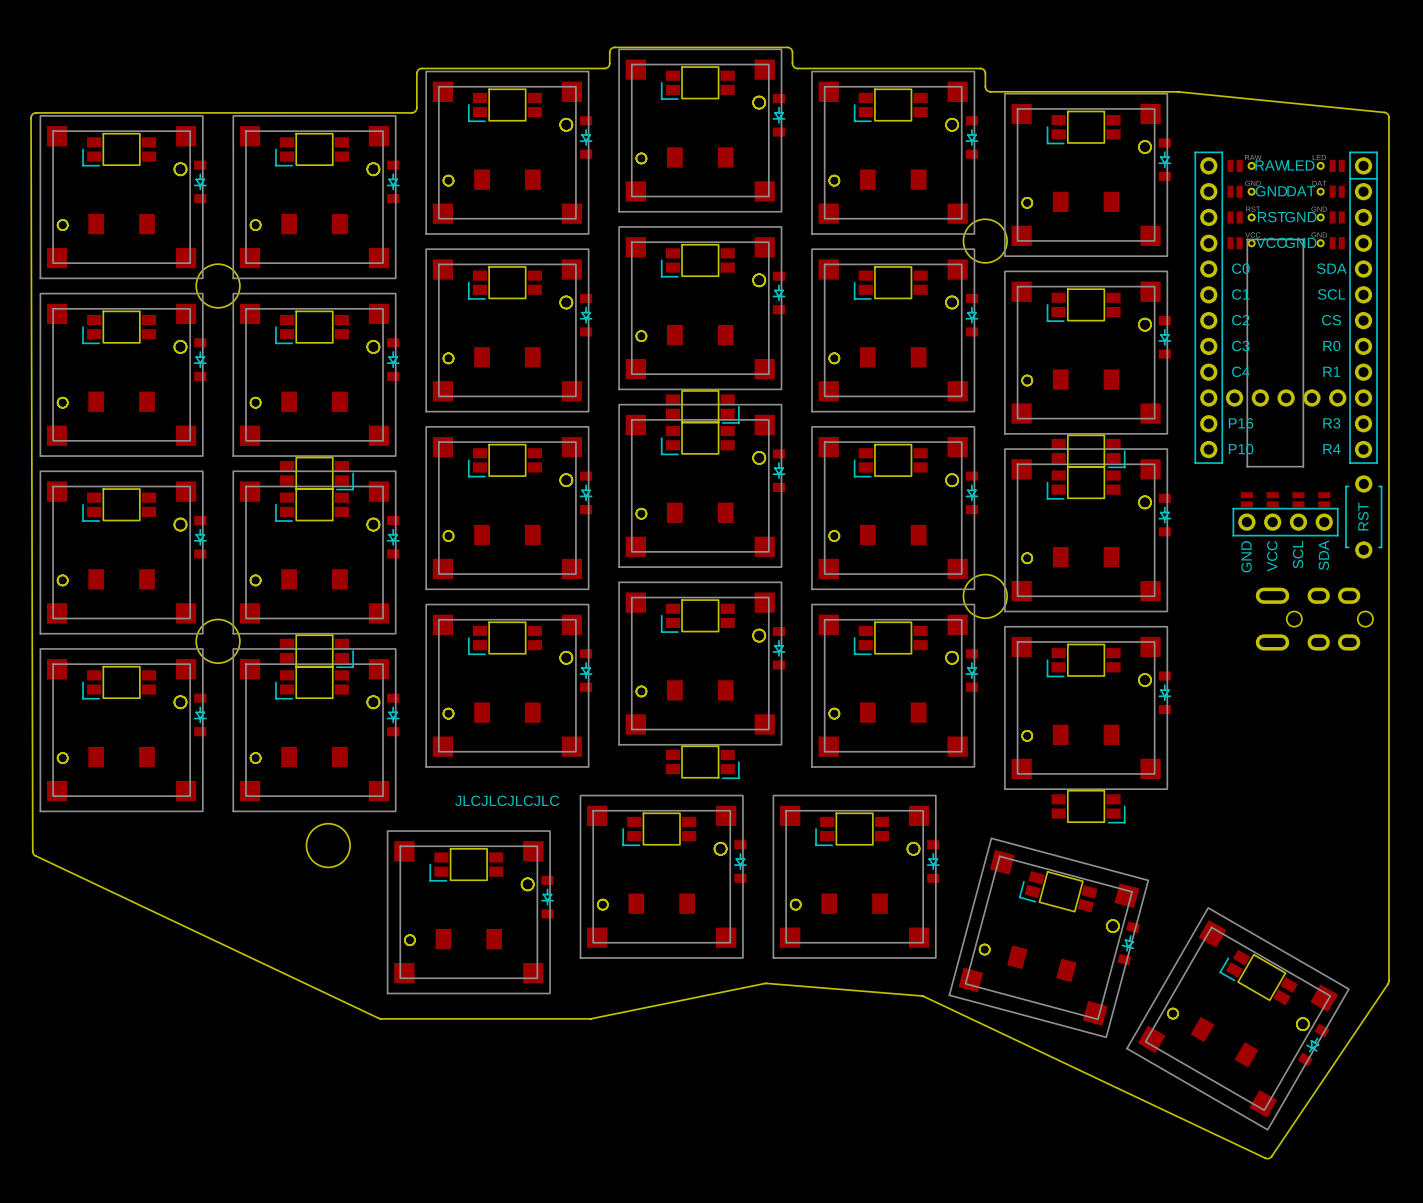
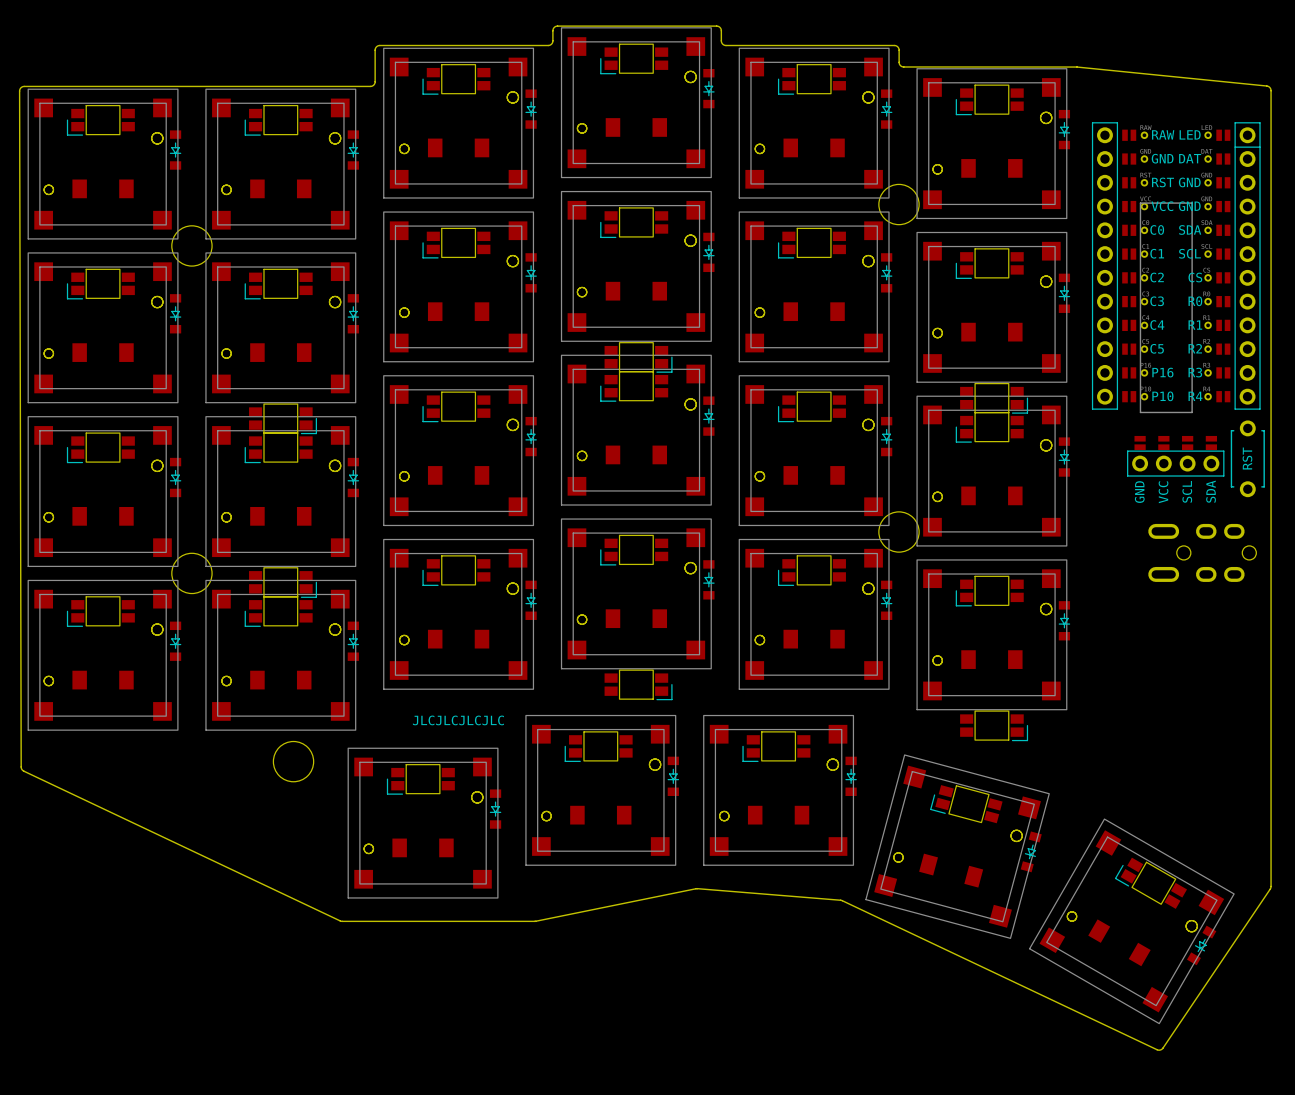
part footprint: [1194, 151, 1378, 464] -> [1091, 122, 1261, 410]

